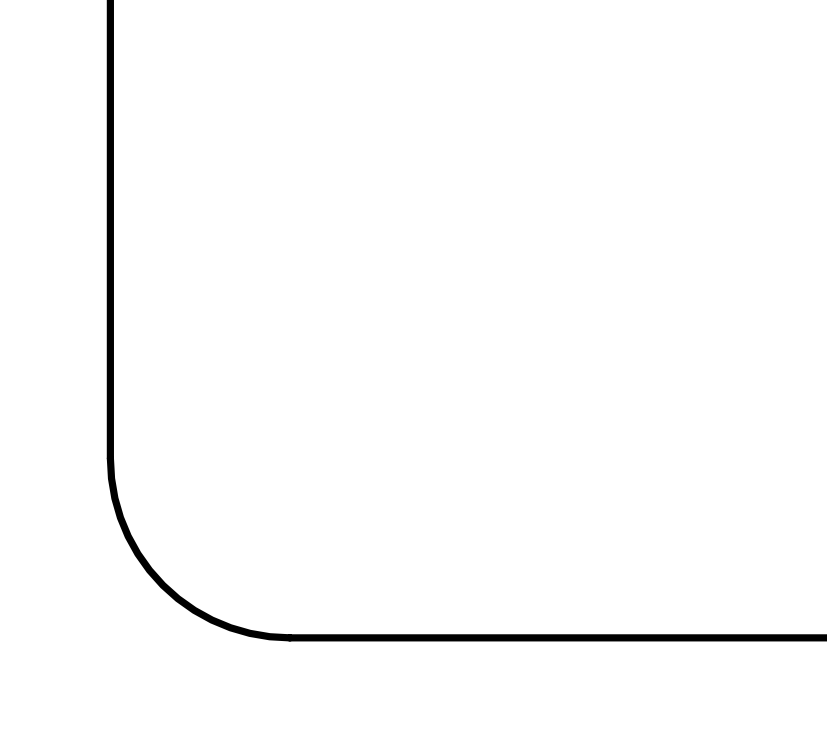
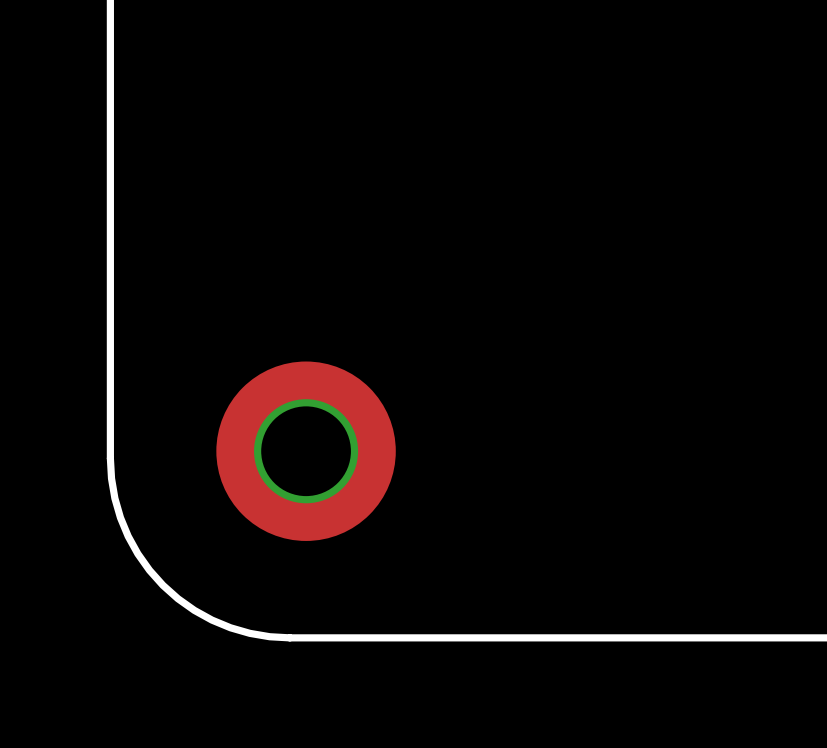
part: none -> (306, 451)

